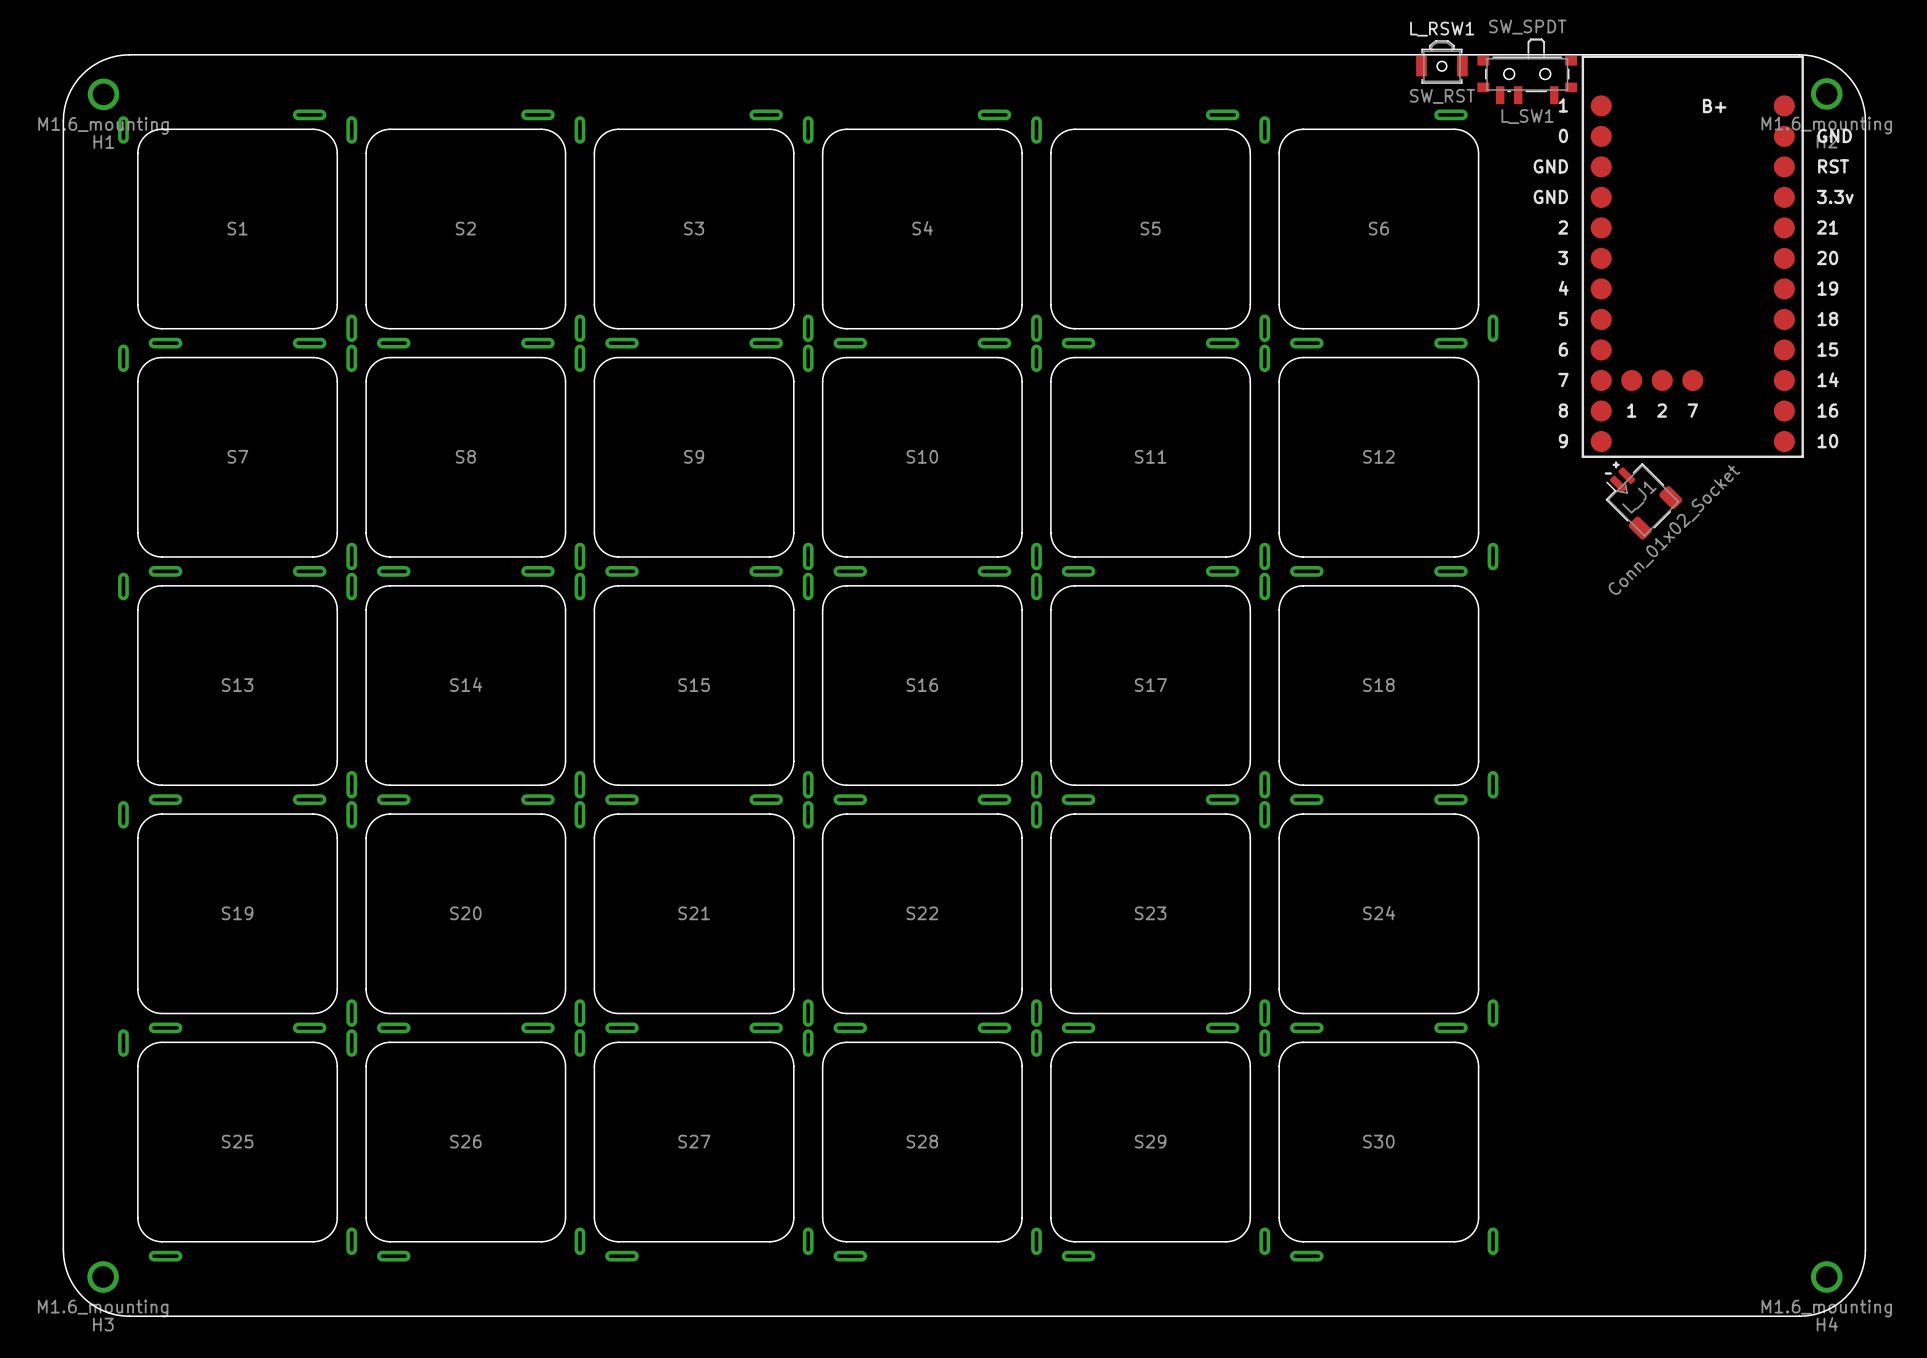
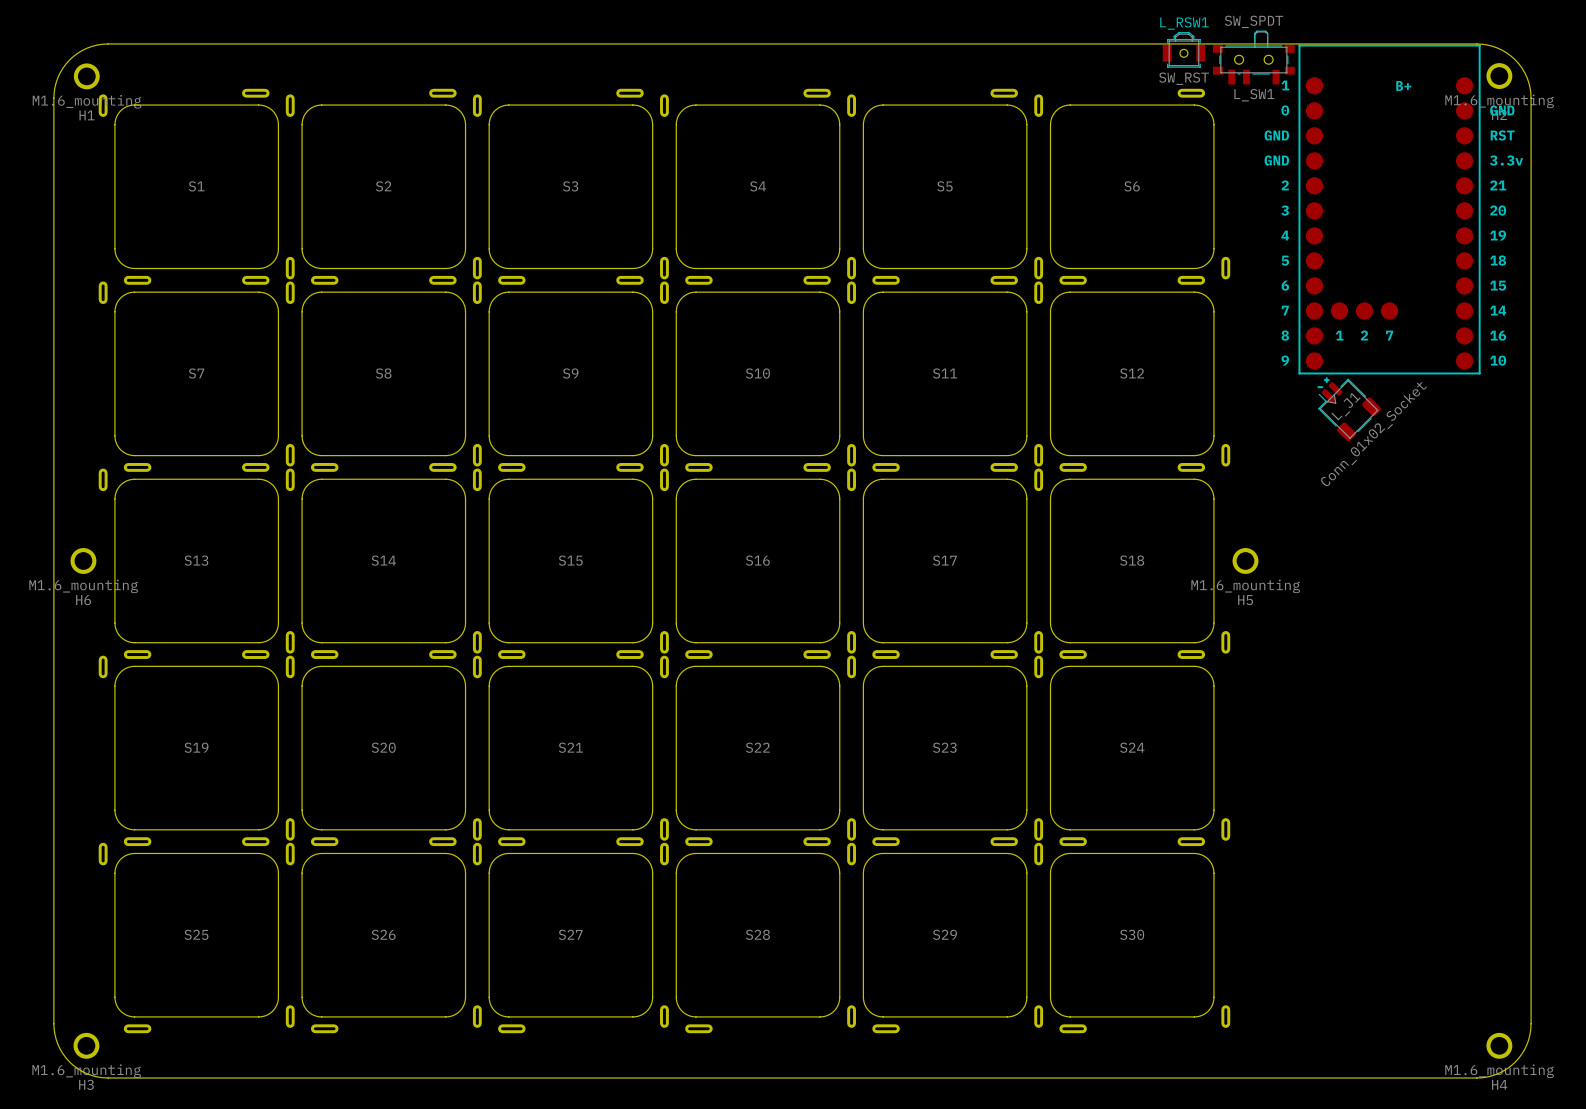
H6: none -> M1.6_mounting (83, 560)
H5: none -> M1.6_mounting (1245, 560)

